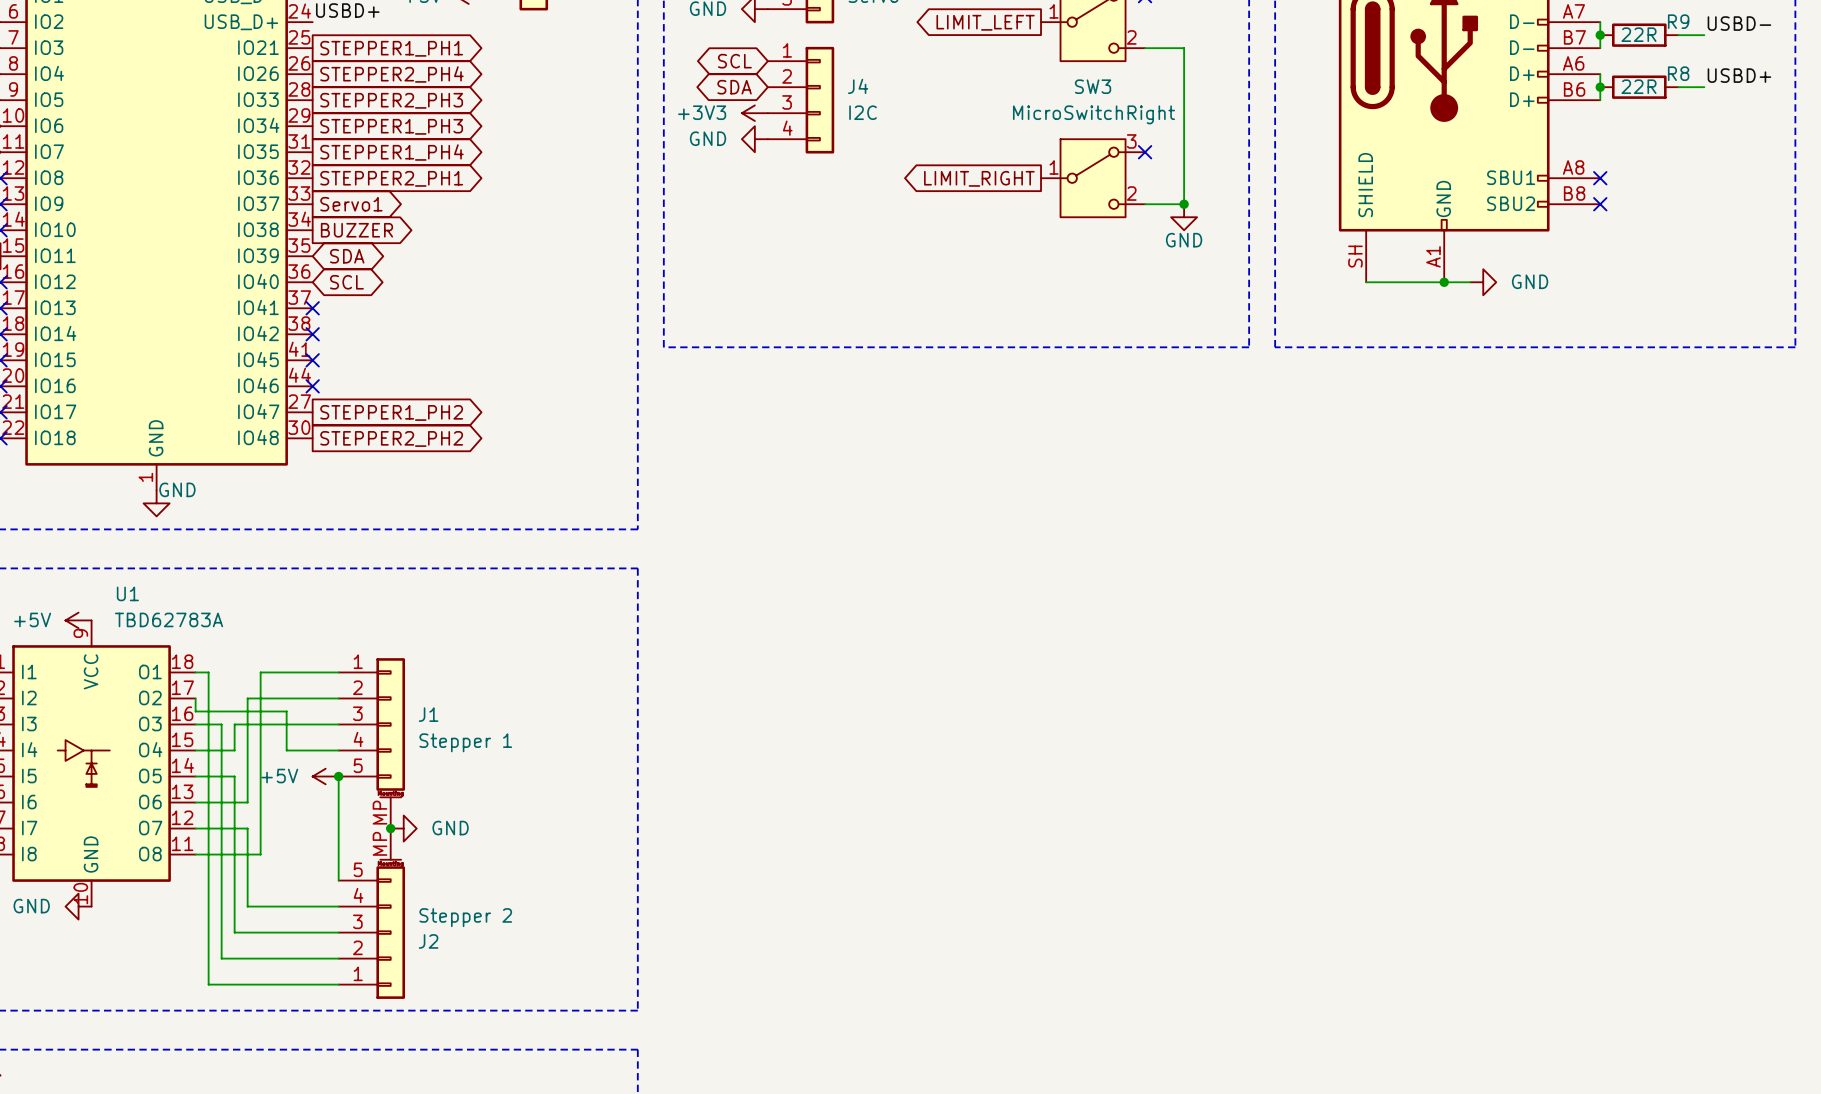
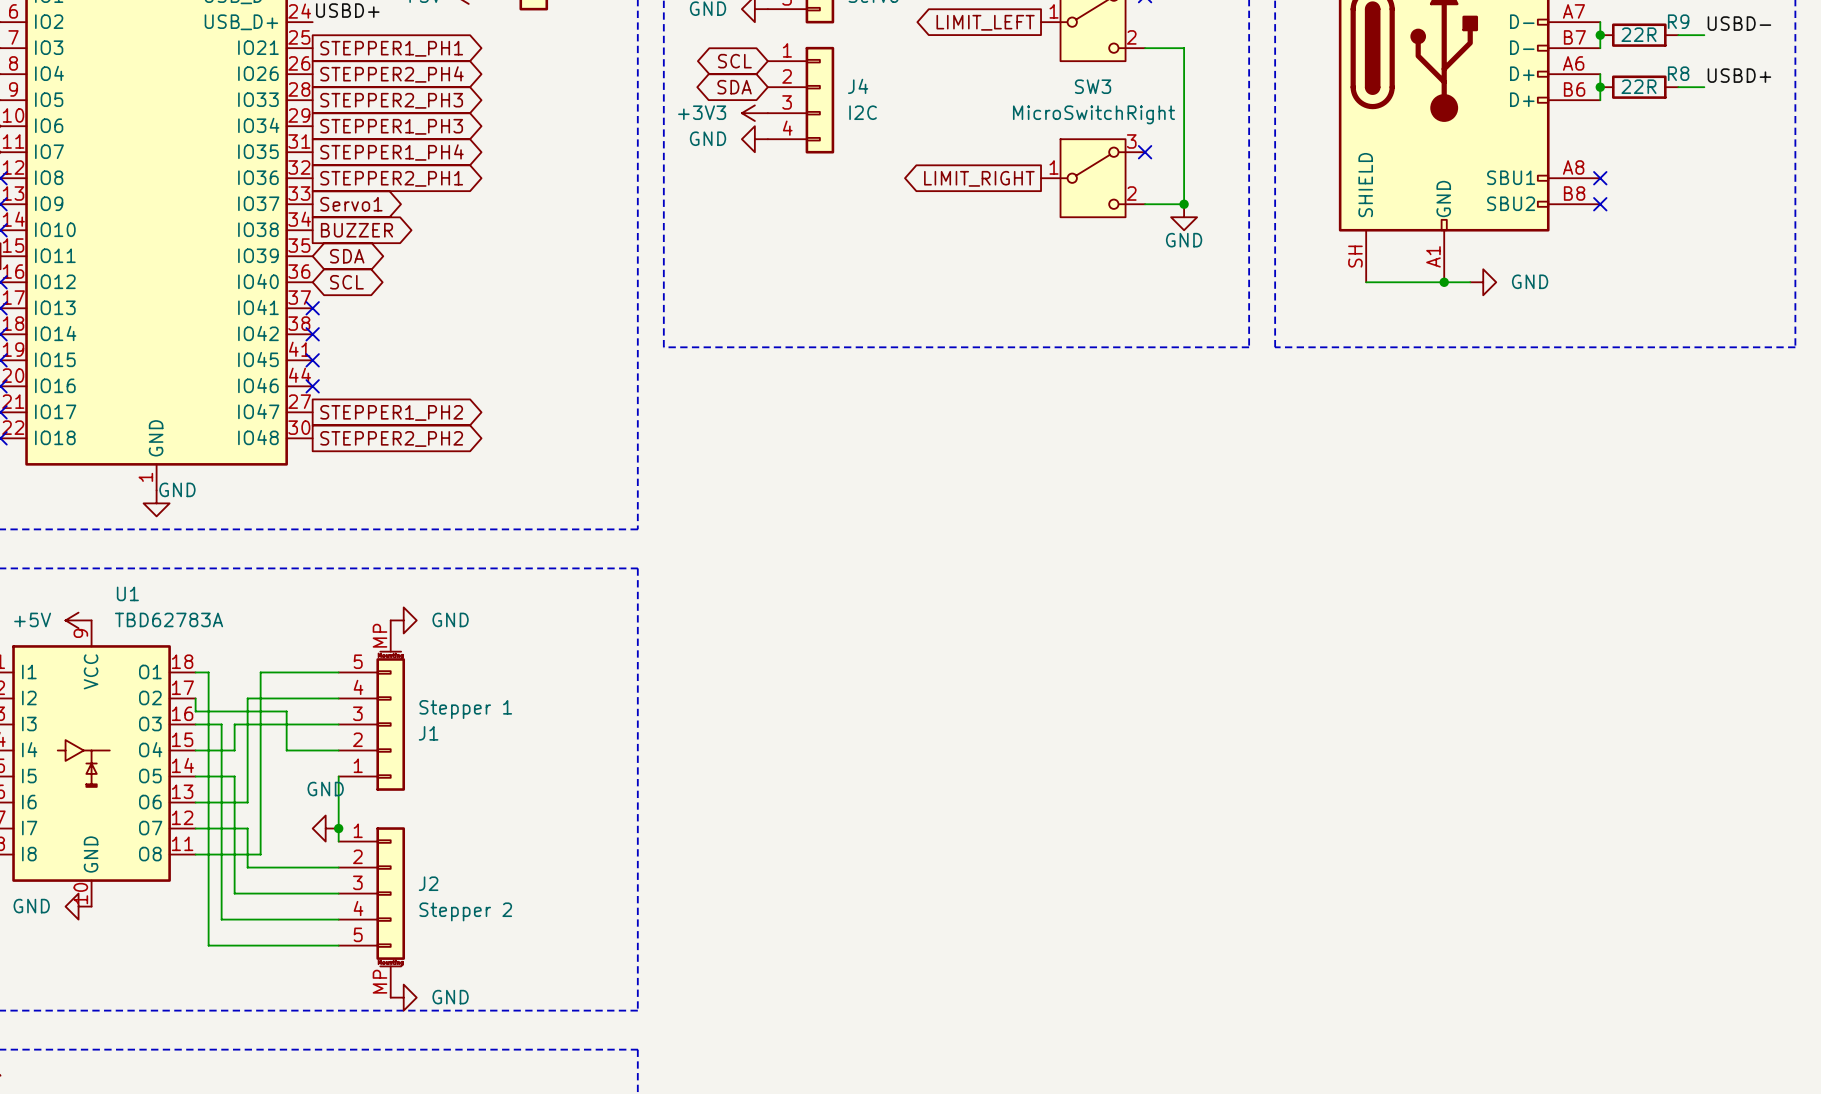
power symbol: none -> GND (403, 620)
J1 flip: as is (390, 728) -> up-down (390, 720)
power symbol: +5V (325, 776) -> none
junction: (338, 776) -> none
junction: none -> (338, 828)
junction: (390, 828) -> none
power symbol rotation: 0° (403, 828) -> 180° (325, 828)
power symbol position: GND (403, 828) -> GND (325, 828)
power symbol text position: GND (450, 828) -> GND (325, 789)
wire: (338, 841) (338, 880) -> none
wire: (247, 867) (247, 906) (338, 906) -> (247, 867) (338, 867)
wire: (234, 893) (234, 932) (338, 932) -> (234, 893) (338, 893)
wire: (221, 919) (221, 958) (338, 958) -> (221, 919) (338, 919)
J2 flip: as is (390, 928) -> up-down (390, 897)
wire: (208, 945) (208, 984) (338, 984) -> (208, 945) (338, 945)
power symbol: none -> GND (403, 997)

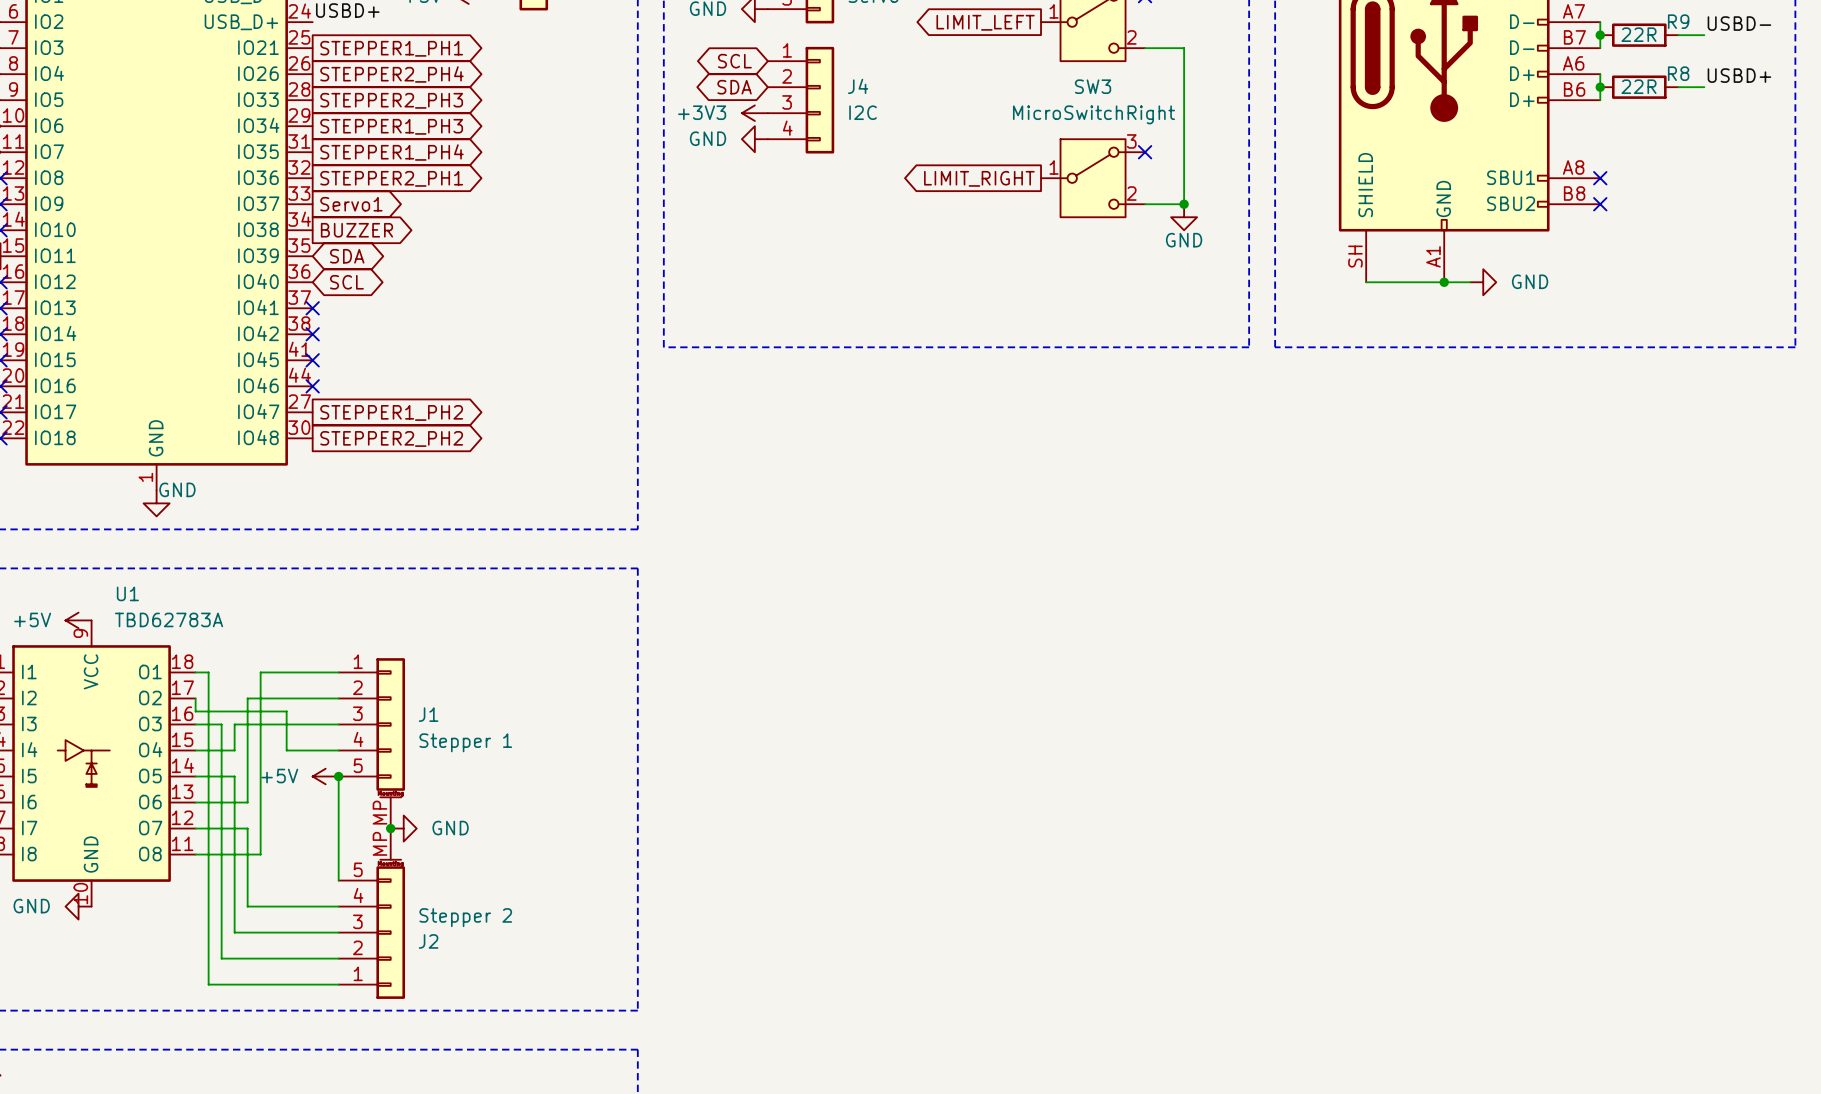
power symbol: GND (403, 620) -> none
J1 flip: as is (390, 720) -> up-down (390, 728)
power symbol: none -> +5V (325, 776)
junction: none -> (338, 776)
power symbol text position: GND (325, 789) -> GND (450, 828)
power symbol rotation: 0° (325, 828) -> 180° (403, 828)
power symbol position: GND (325, 828) -> GND (403, 828)
junction: (338, 828) -> none
junction: none -> (390, 828)
wire: none -> (338, 841) (338, 880)
wire: (247, 867) (338, 867) -> (247, 867) (247, 906) (338, 906)
wire: (234, 893) (338, 893) -> (234, 893) (234, 932) (338, 932)
J2 flip: as is (390, 897) -> up-down (390, 928)
wire: (221, 919) (338, 919) -> (221, 919) (221, 958) (338, 958)
wire: (208, 945) (338, 945) -> (208, 945) (208, 984) (338, 984)
power symbol: GND (403, 997) -> none

